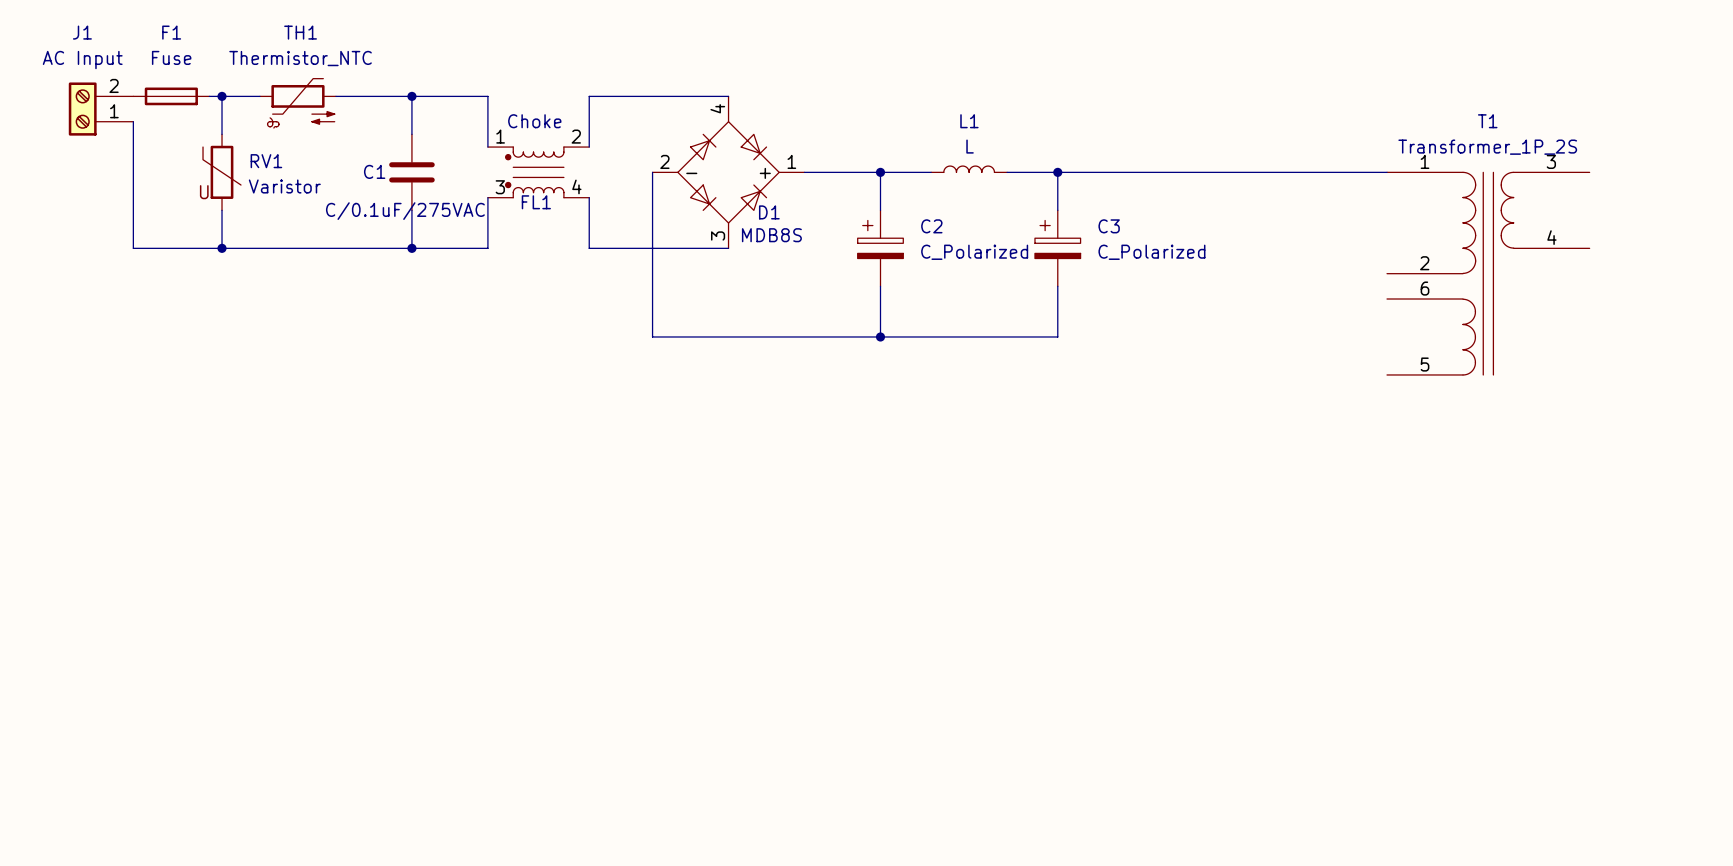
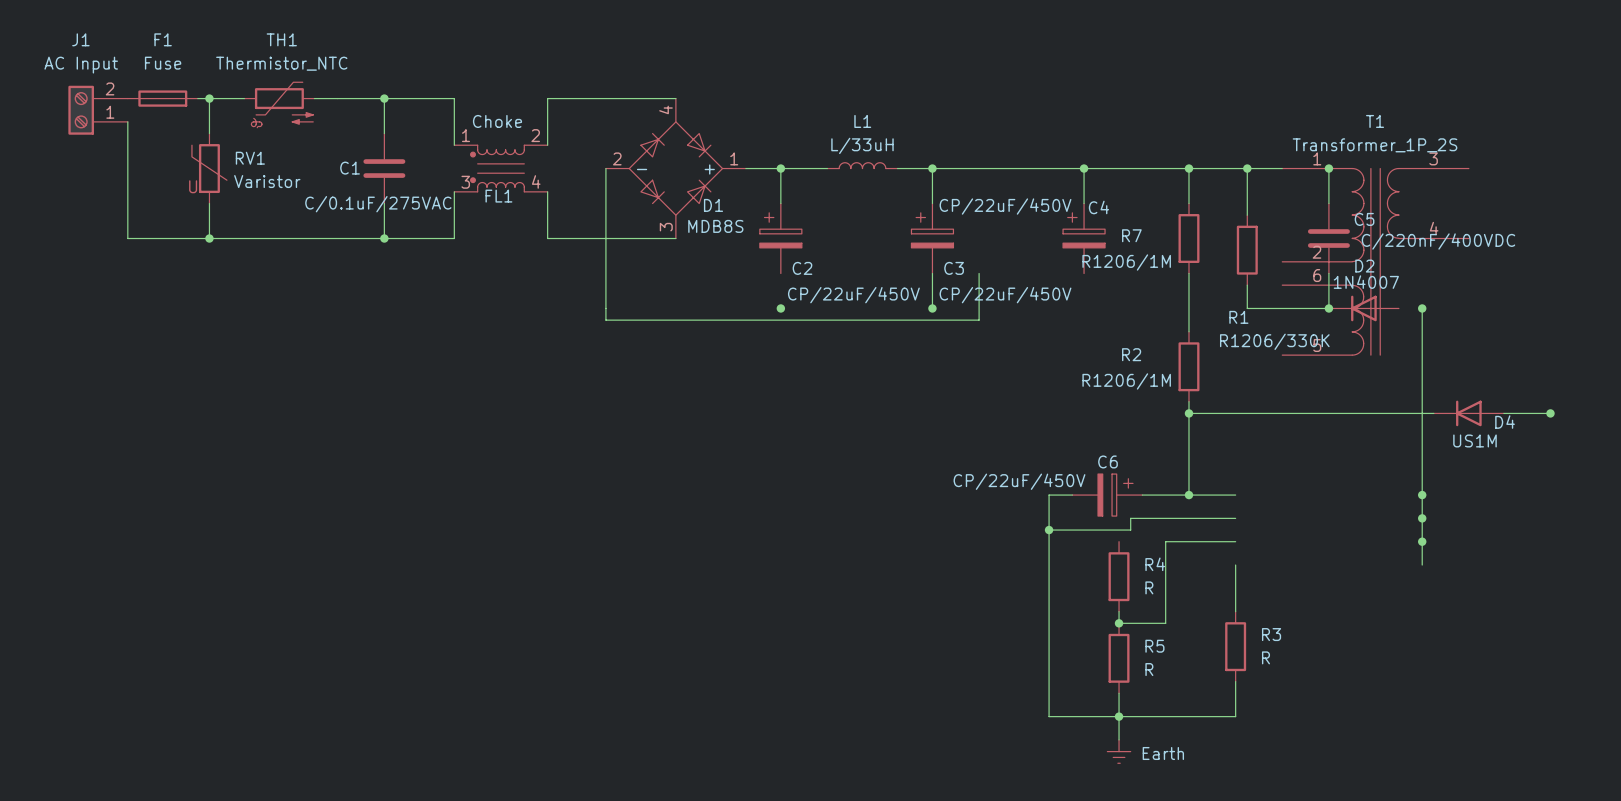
L1 value: L (970, 146) -> L/33uH (862, 145)
L1 position: (969, 169) -> (862, 165)
wire: (880, 172) (880, 210) -> (780, 168) (780, 203)
junction position: (880, 172) -> (780, 168)
wire: (893, 172) (931, 172) -> none
wire: none -> (897, 168) (932, 168) (932, 203)
wire: (1057, 172) (1057, 210) -> (1084, 168) (1084, 203)
junction position: (1057, 172) -> (932, 168)
junction: none -> (1084, 168)
wire: none -> (1188, 168) (1188, 203)
junction: none -> (1188, 168)
wire: none -> (1247, 168) (1247, 215)
junction: none -> (1247, 168)
wire: none -> (1328, 168) (1328, 203)
junction: none -> (1328, 168)
C2 name position: C2 (931, 226) -> C2 (802, 268)
C3 name position: C3 (1109, 226) -> C3 (954, 268)
C2 position: (880, 248) -> (780, 238)
C3 position: (1057, 248) -> (932, 238)
C4: none -> CP/22uF/450V (1084, 238)
R7: none -> R1206/1M (1188, 238)
C5: none -> C/220nF/400VDC (1328, 238)
C2 value: C_Polarized (974, 252) -> CP/22uF/450V (853, 295)
C3 value: C_Polarized (1151, 252) -> CP/22uF/450V (1005, 295)
R1: none -> R1206/330K (1247, 250)
wire: (880, 286) (880, 336) -> none
wire: none -> (932, 273) (932, 308)
wire: none -> (1188, 273) (1188, 331)
wire: none -> (1328, 273) (1328, 308) (1247, 308) (1247, 285)
junction: none -> (932, 308)
junction: none -> (1328, 308)
D2: none -> 1N4007 (1363, 308)
wire: none -> (1422, 308) (1422, 565)
junction: none -> (1422, 308)
junction position: (880, 336) -> (780, 308)
R2: none -> R1206/1M (1188, 366)
wire: none -> (1188, 401) (1188, 495)
wire: none -> (1188, 413) (1433, 413)
junction: none -> (1188, 413)
D4: none -> US1M (1468, 413)
wire: none -> (1503, 413) (1550, 413)
junction: none -> (1550, 413)
wire: none -> (1072, 495) (1049, 495) (1049, 716) (1235, 716) (1235, 681)
C6: none -> CP/22uF/450V (1107, 495)
wire: none -> (1142, 495) (1235, 495)
junction: none -> (1188, 495)
junction: none -> (1422, 495)
wire: none -> (1235, 518) (1130, 518) (1130, 530) (1049, 530)
junction: none -> (1422, 518)
junction: none -> (1049, 530)
wire: none -> (1235, 541) (1165, 541) (1165, 623) (1119, 623) (1119, 611)
junction: none -> (1422, 541)
wire: none -> (1235, 565) (1235, 611)
R4: none -> R (1119, 576)
junction: none -> (1119, 623)
R3: none -> R (1235, 646)
R5: none -> R (1119, 658)
wire: none -> (1119, 693) (1119, 739)
junction: none -> (1119, 716)
power symbol: none -> Earth (1119, 751)

